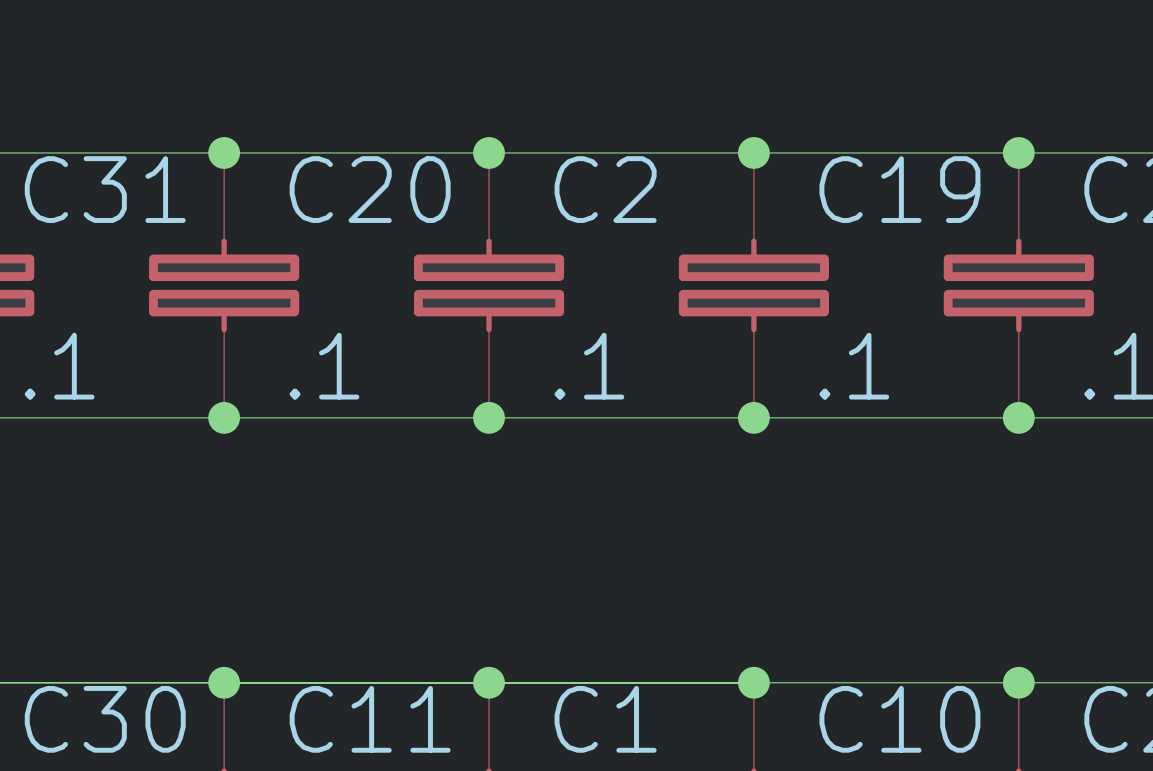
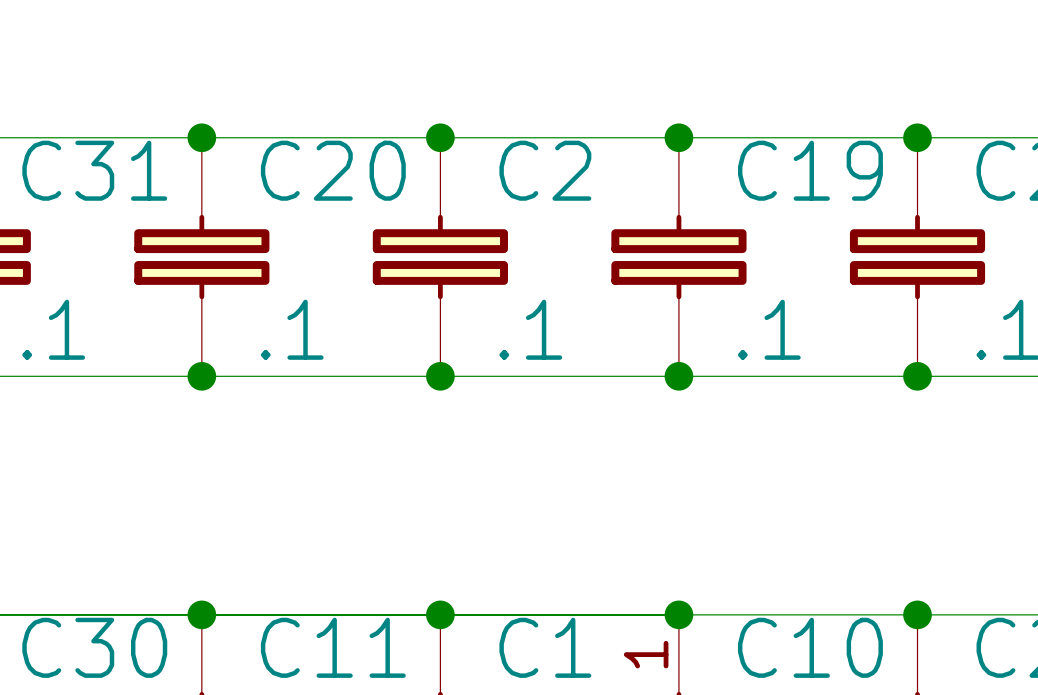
C10 pin number: none -> 1 (646, 654)

